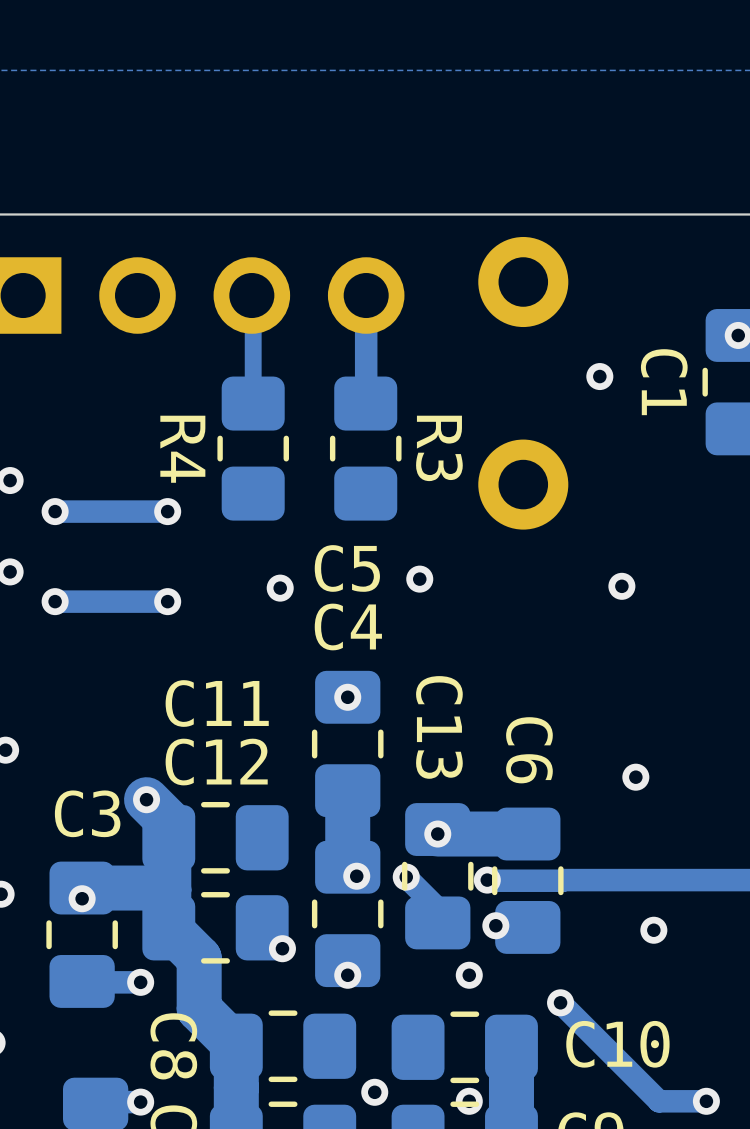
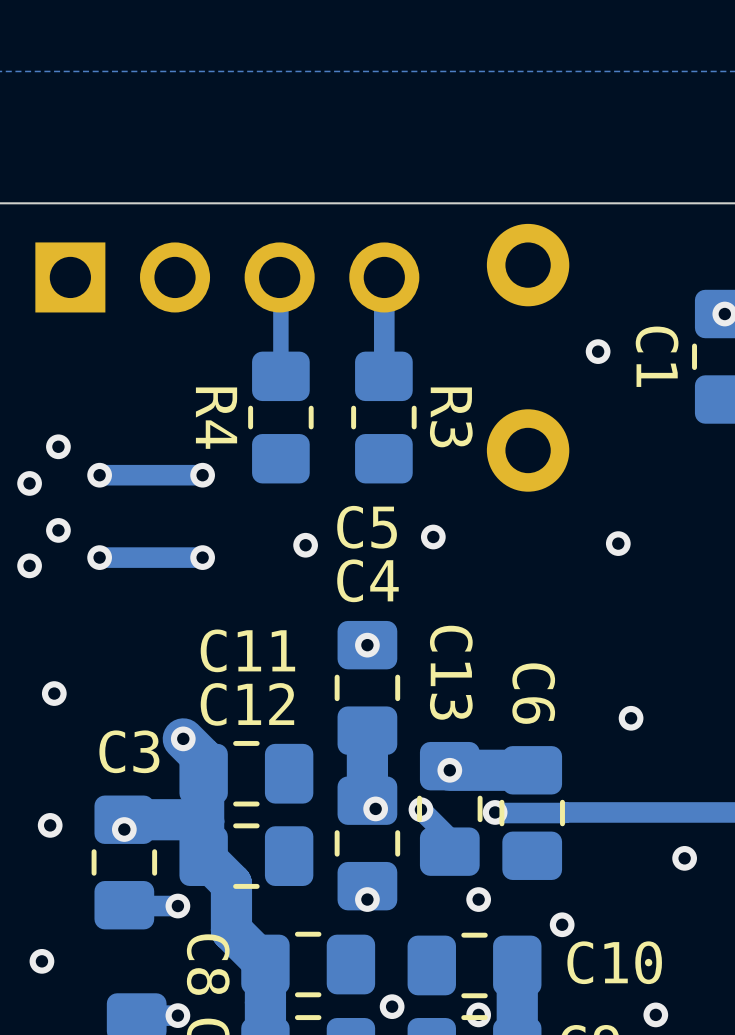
via: (495, 925) -> none
via position: (653, 930) -> (684, 858)
via: (282, 948) -> none
track: (560, 1002) (659, 1101) (706, 1101) -> none
via position: (706, 1101) -> (655, 1014)

